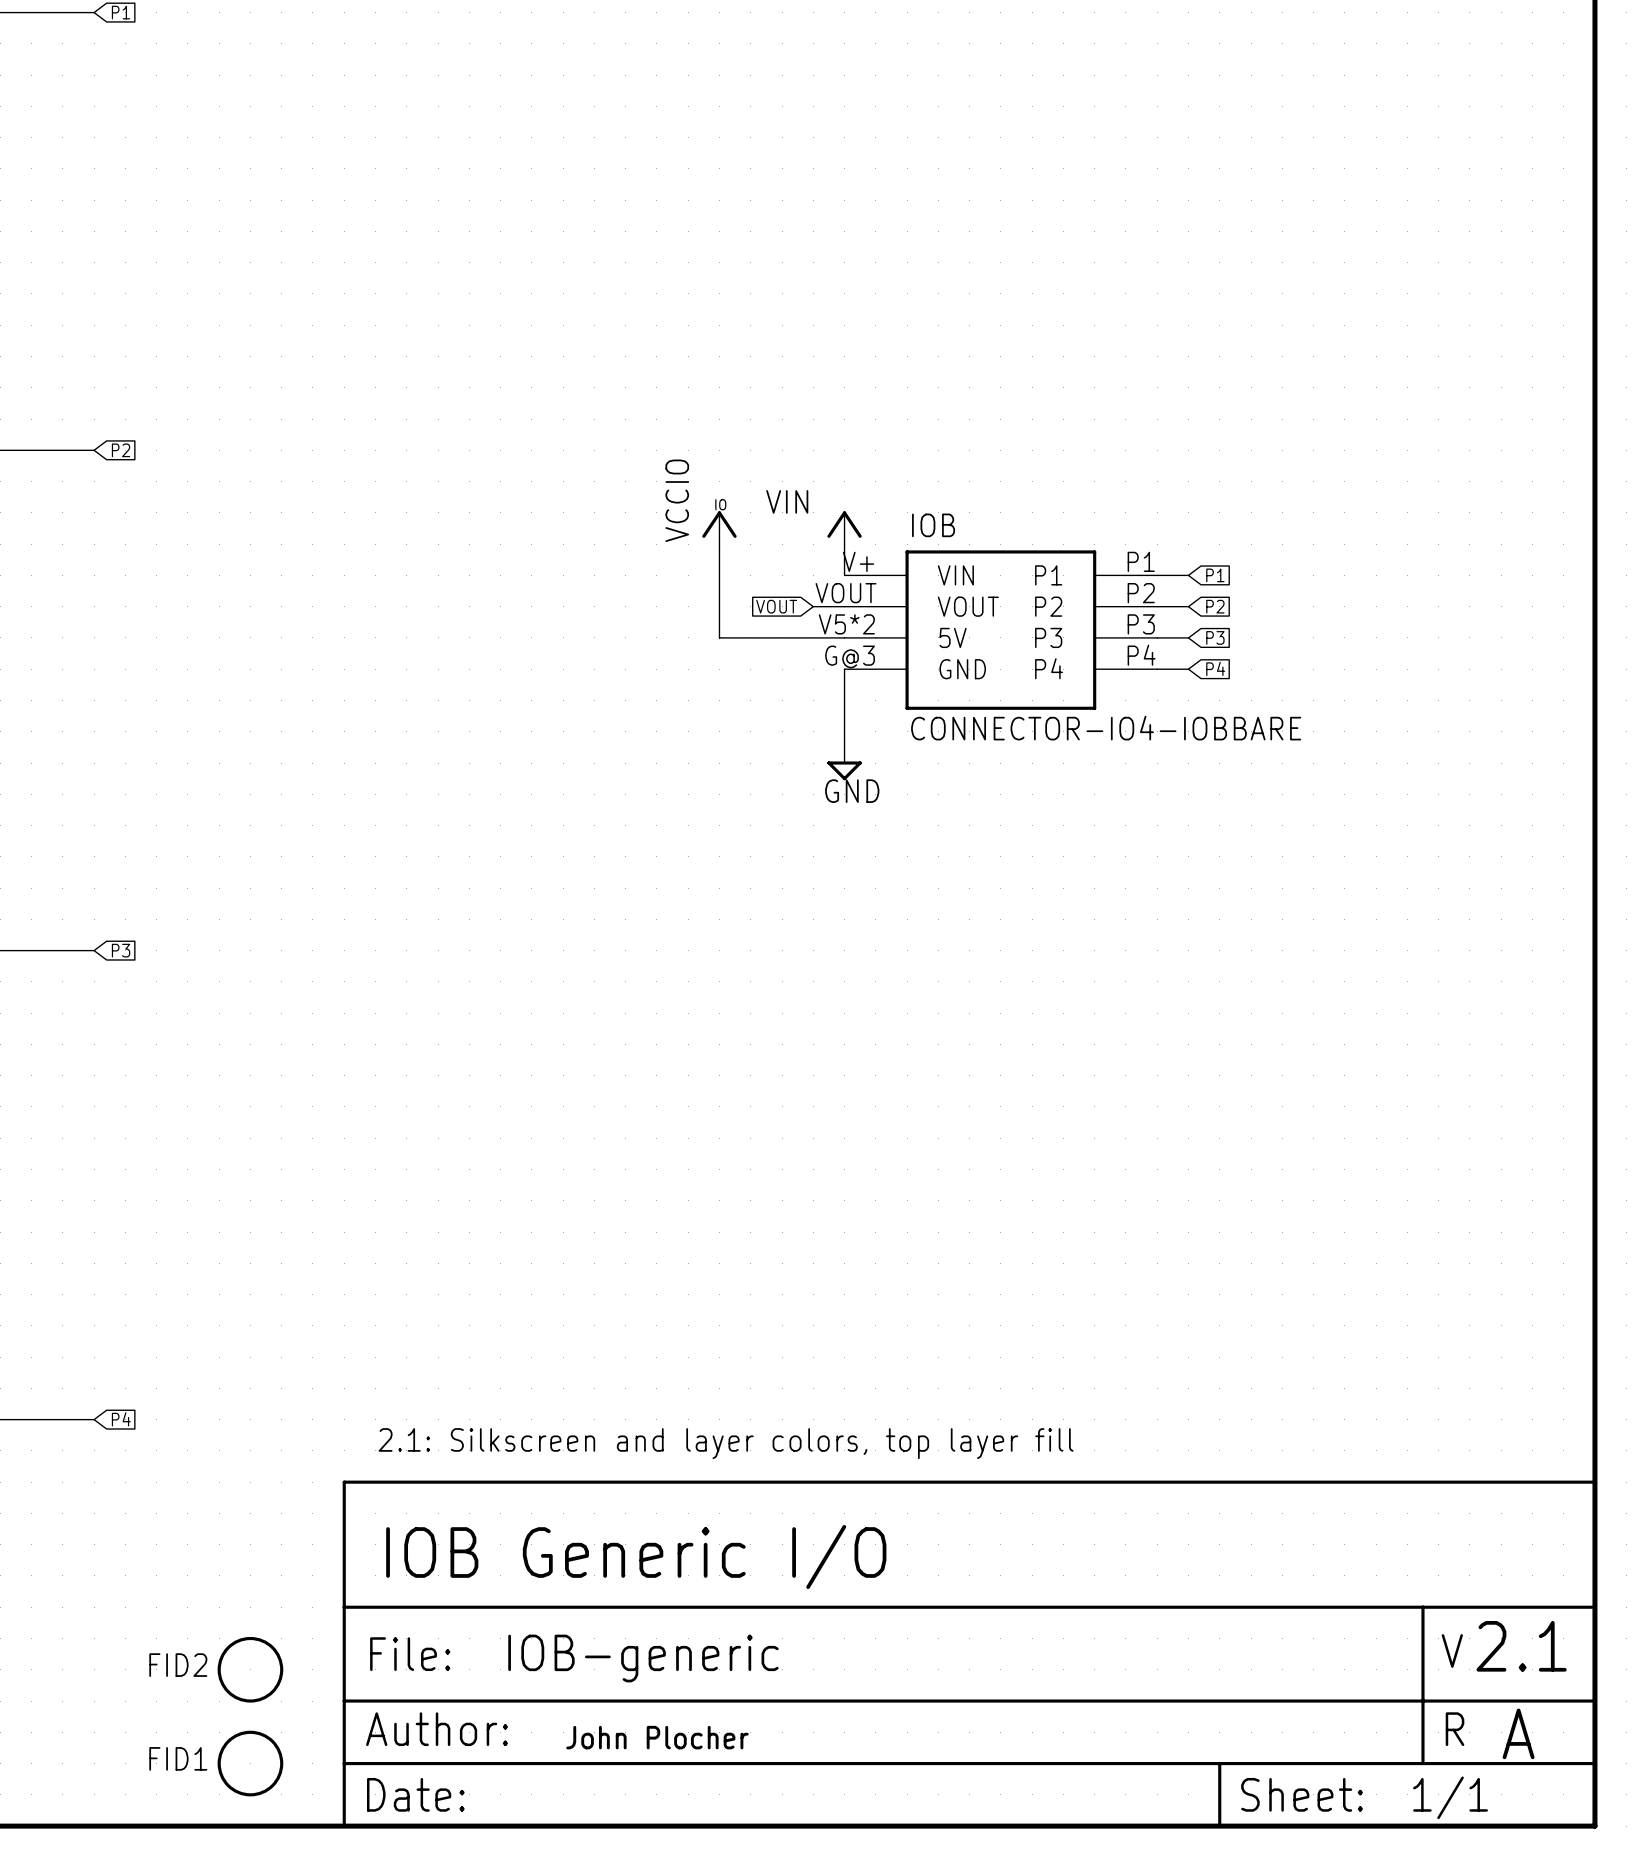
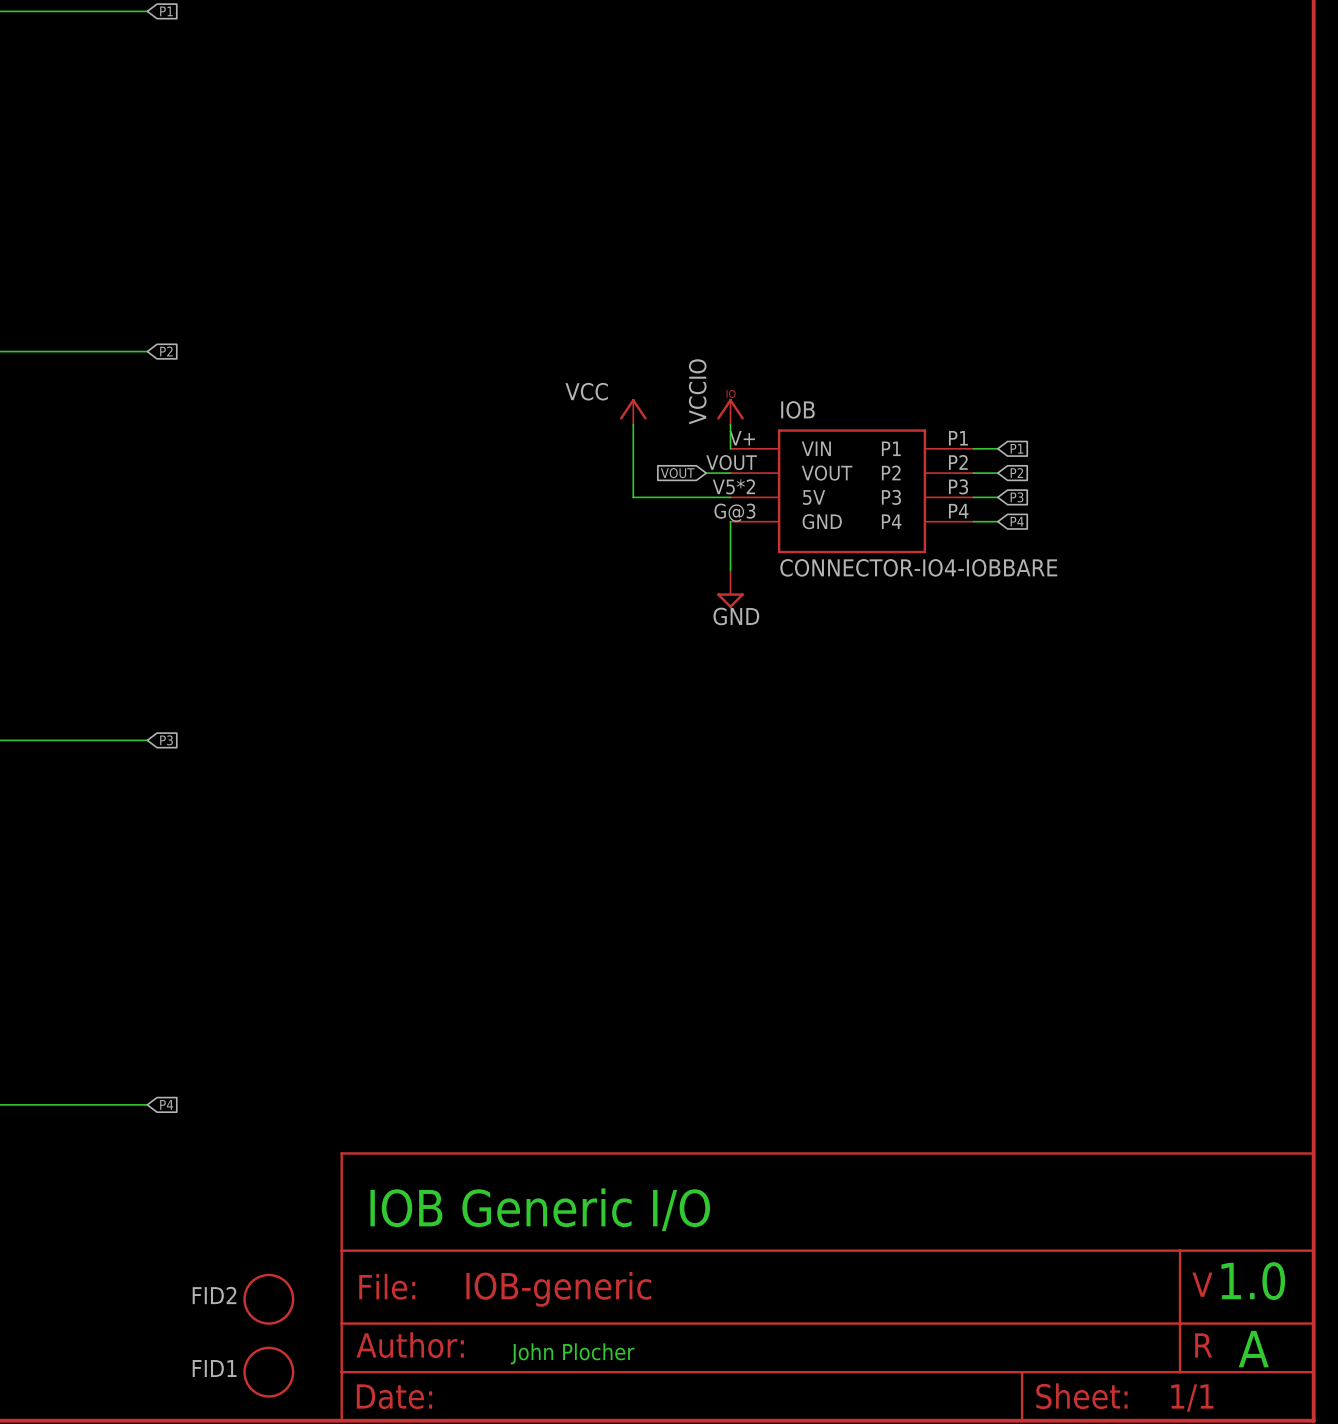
power symbol: VCCIO (719, 527) -> VCC (633, 411)
power symbol: VIN (844, 527) -> VCCIO (730, 411)
text: 2.1: Silkscreen and layer colors, top layer fill (726, 1443) -> none
text: 2.1 (1521, 1646) -> 1.0 (1253, 1281)

